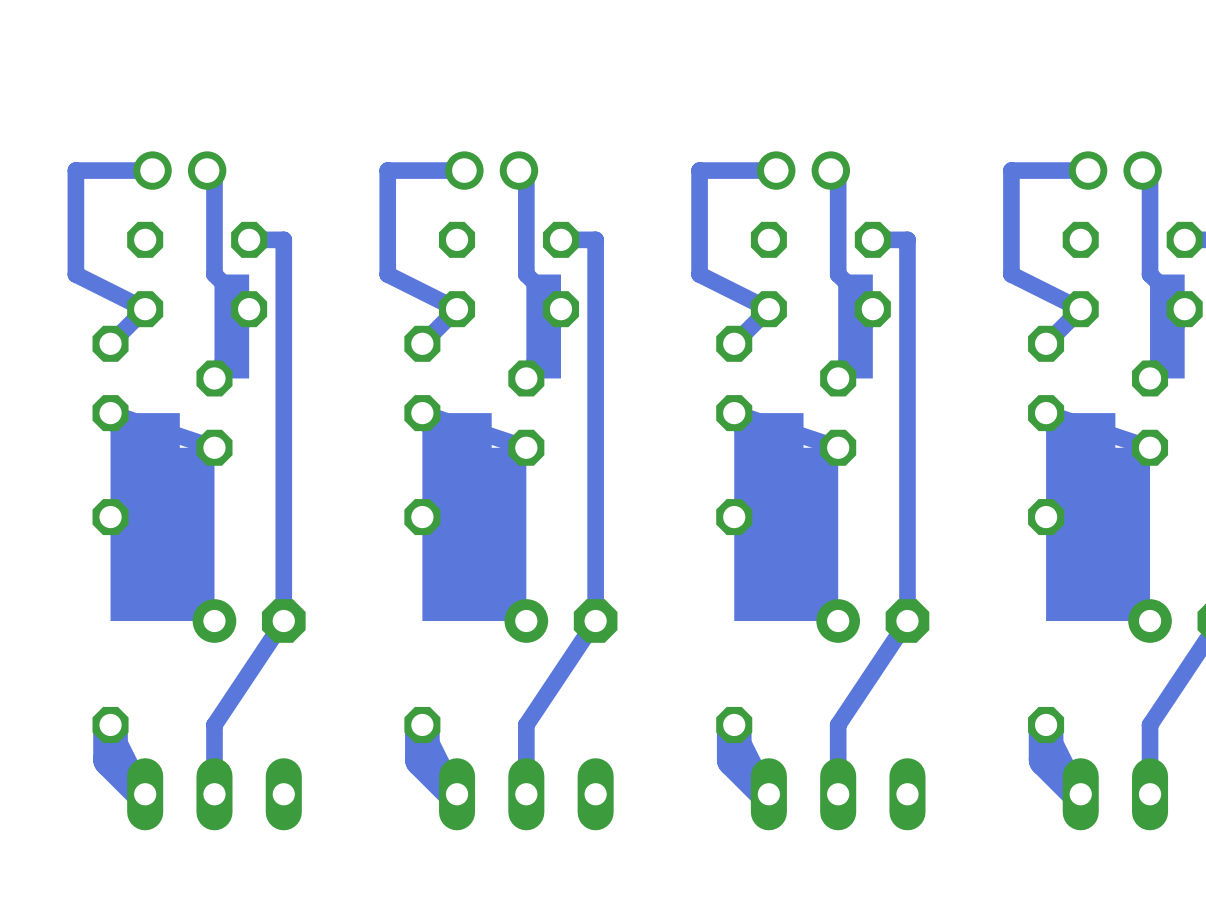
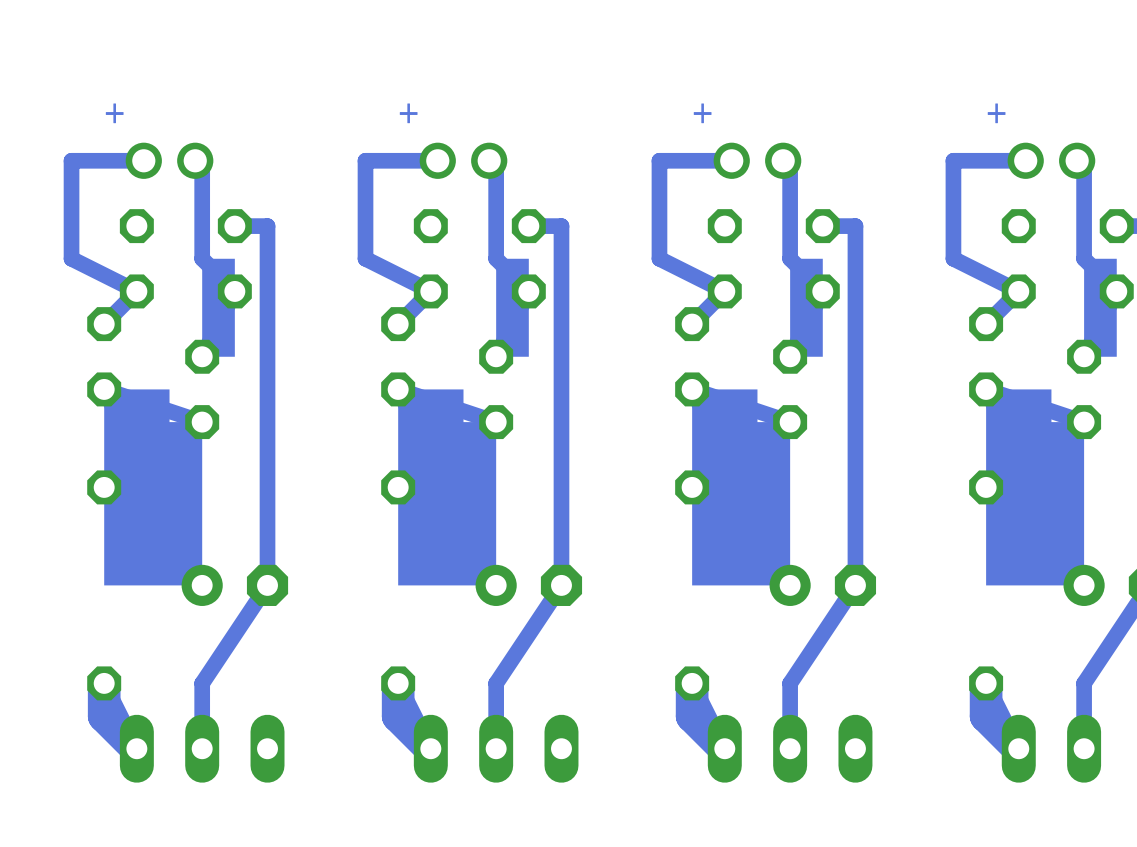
text: none -> + (114, 113)
text: none -> + (408, 113)
text: none -> + (702, 113)
text: none -> + (996, 113)

